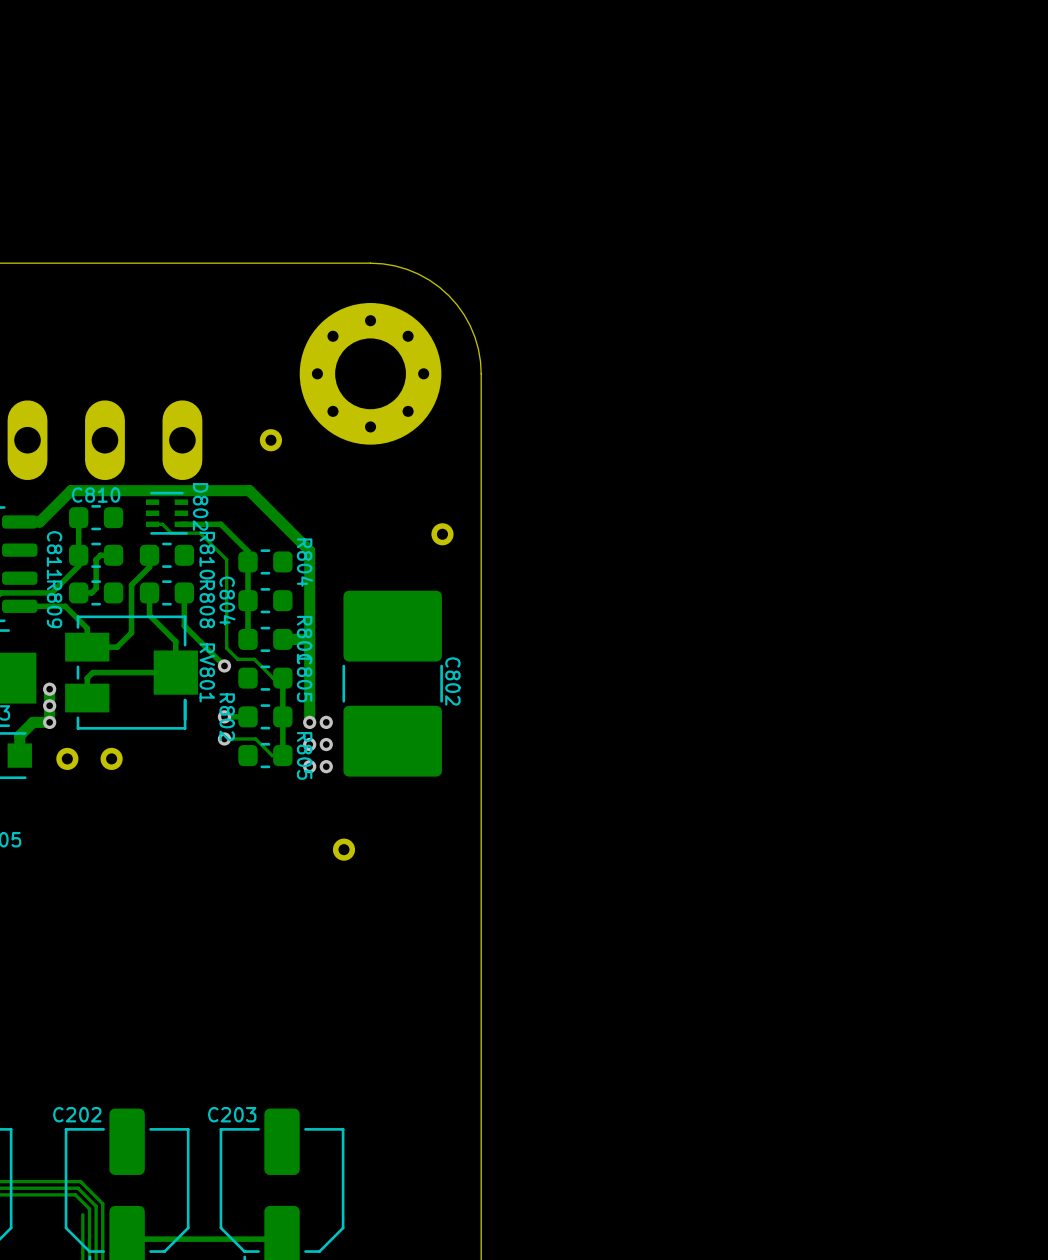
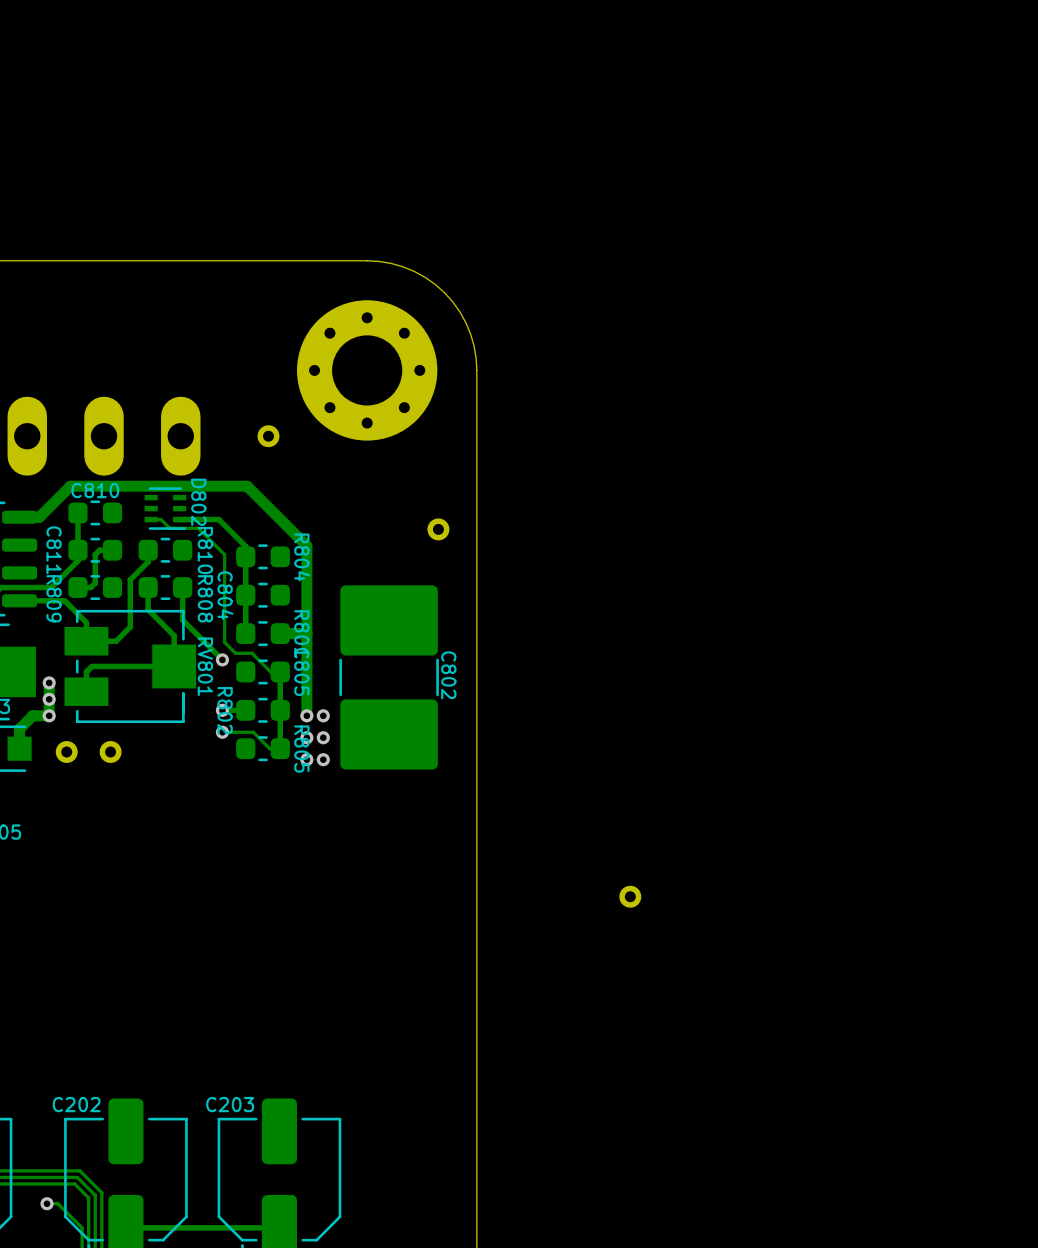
part position: (343, 849) -> (630, 896)
via: none -> (47, 1203)
track: (82, 1214) (82, 1239) -> (47, 1203) (57, 1203) (82, 1227)

